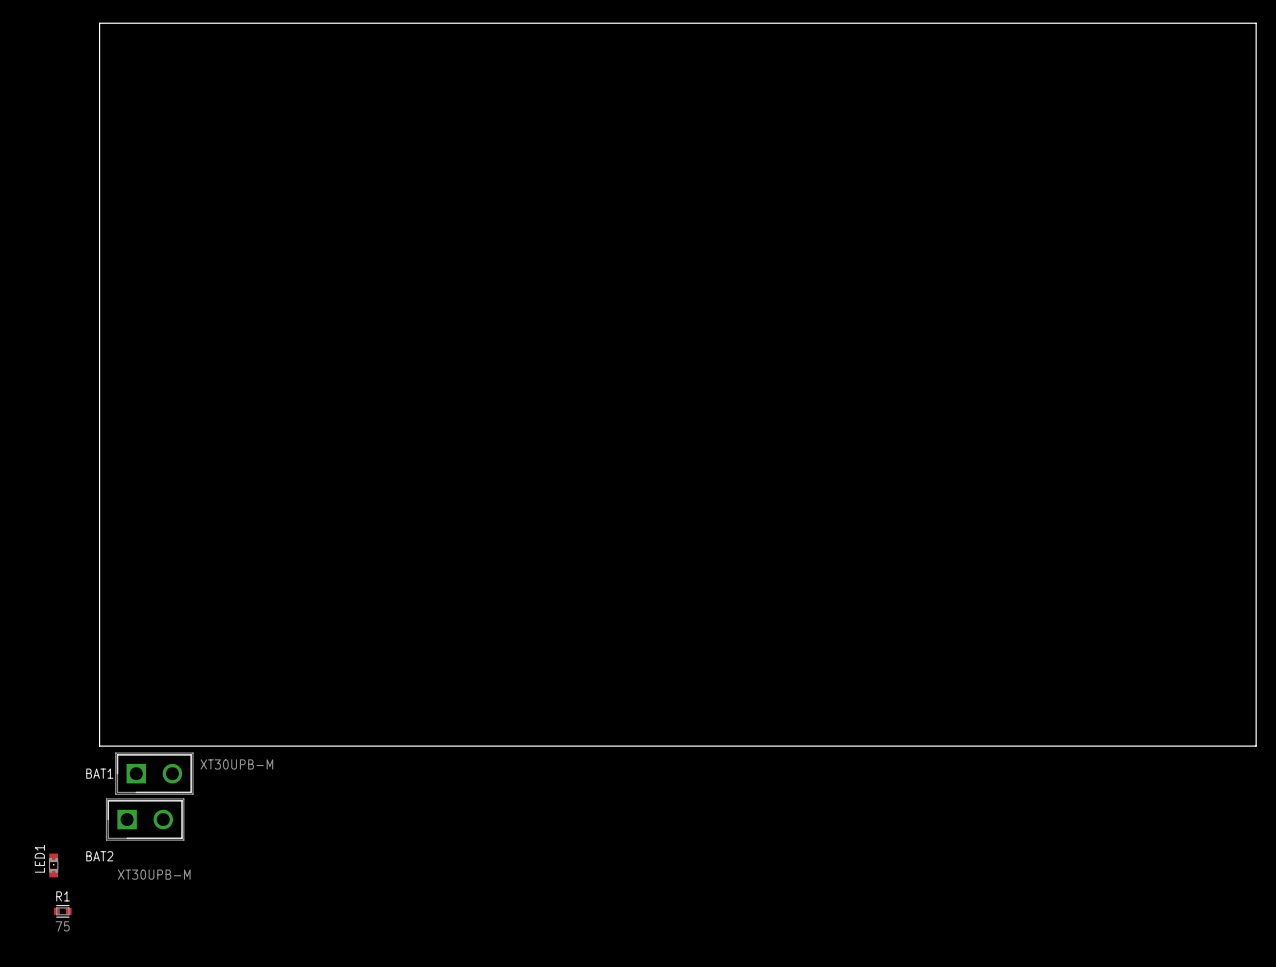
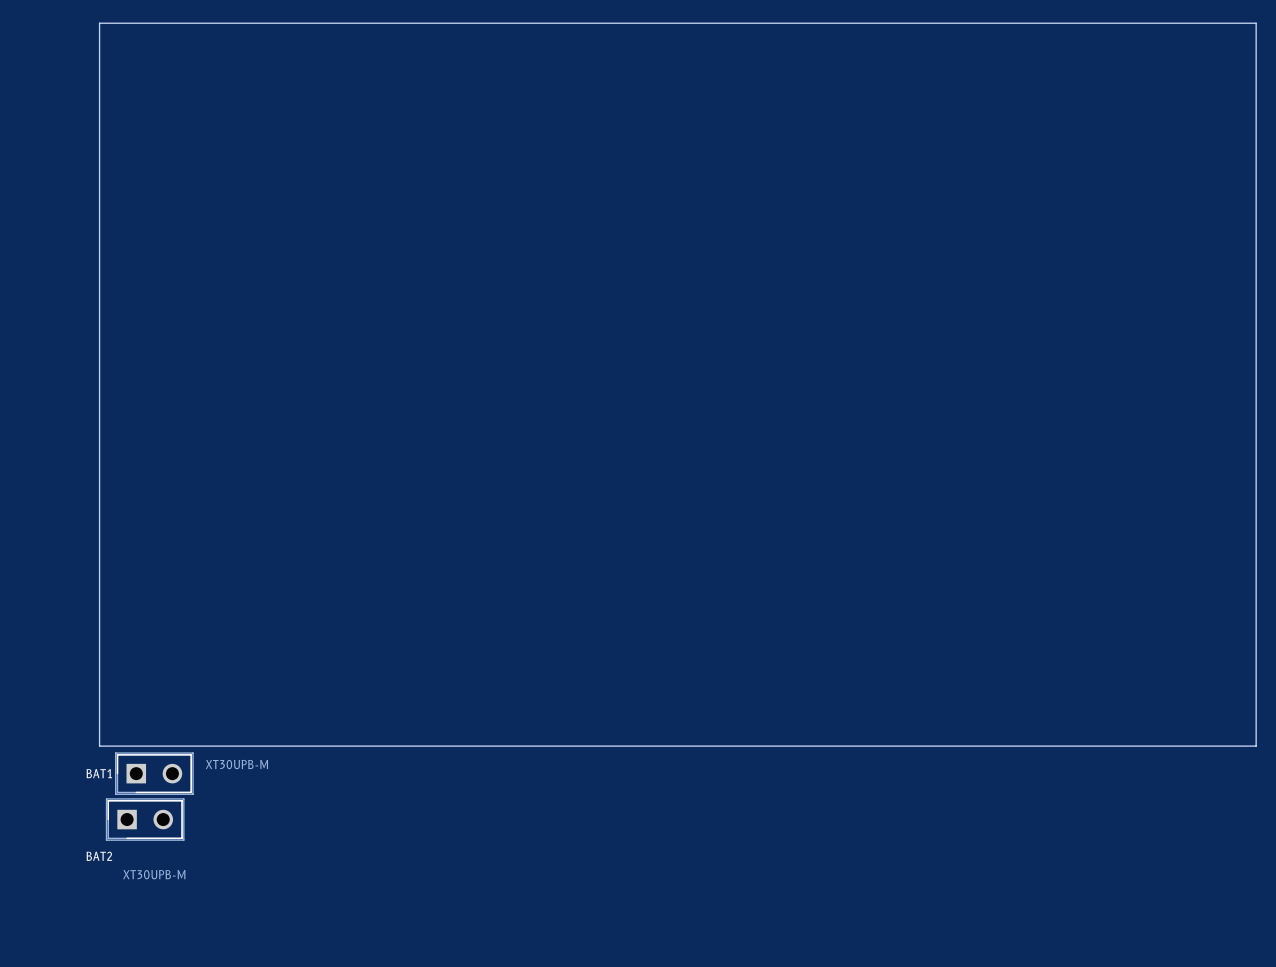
LED1: (53, 865) -> none
R1: 75 (62, 911) -> none

